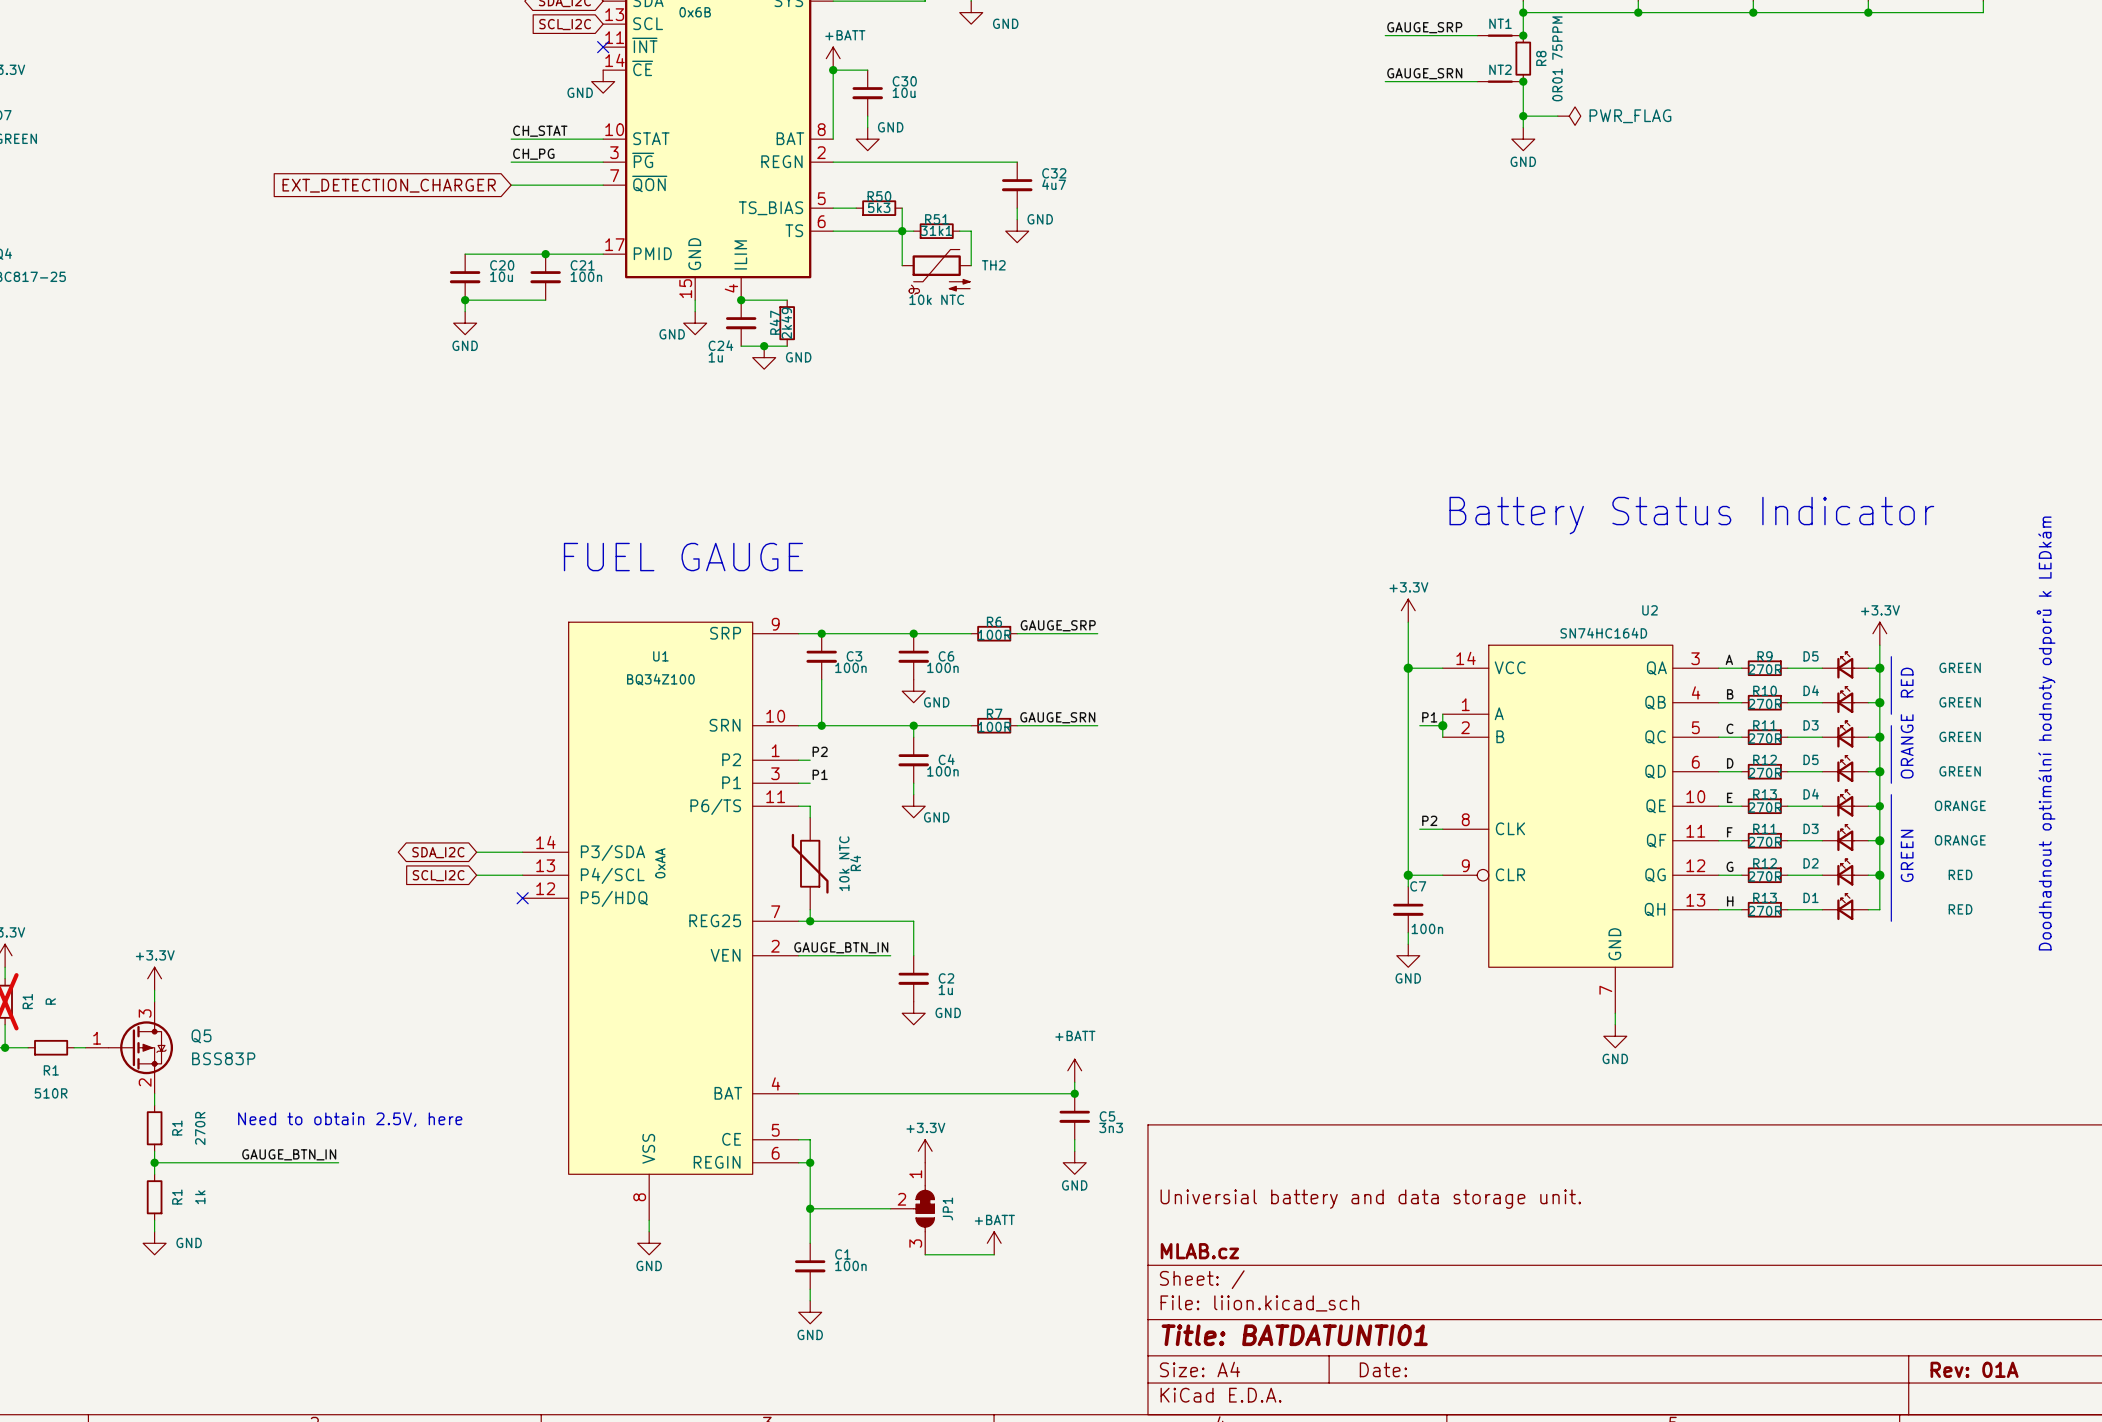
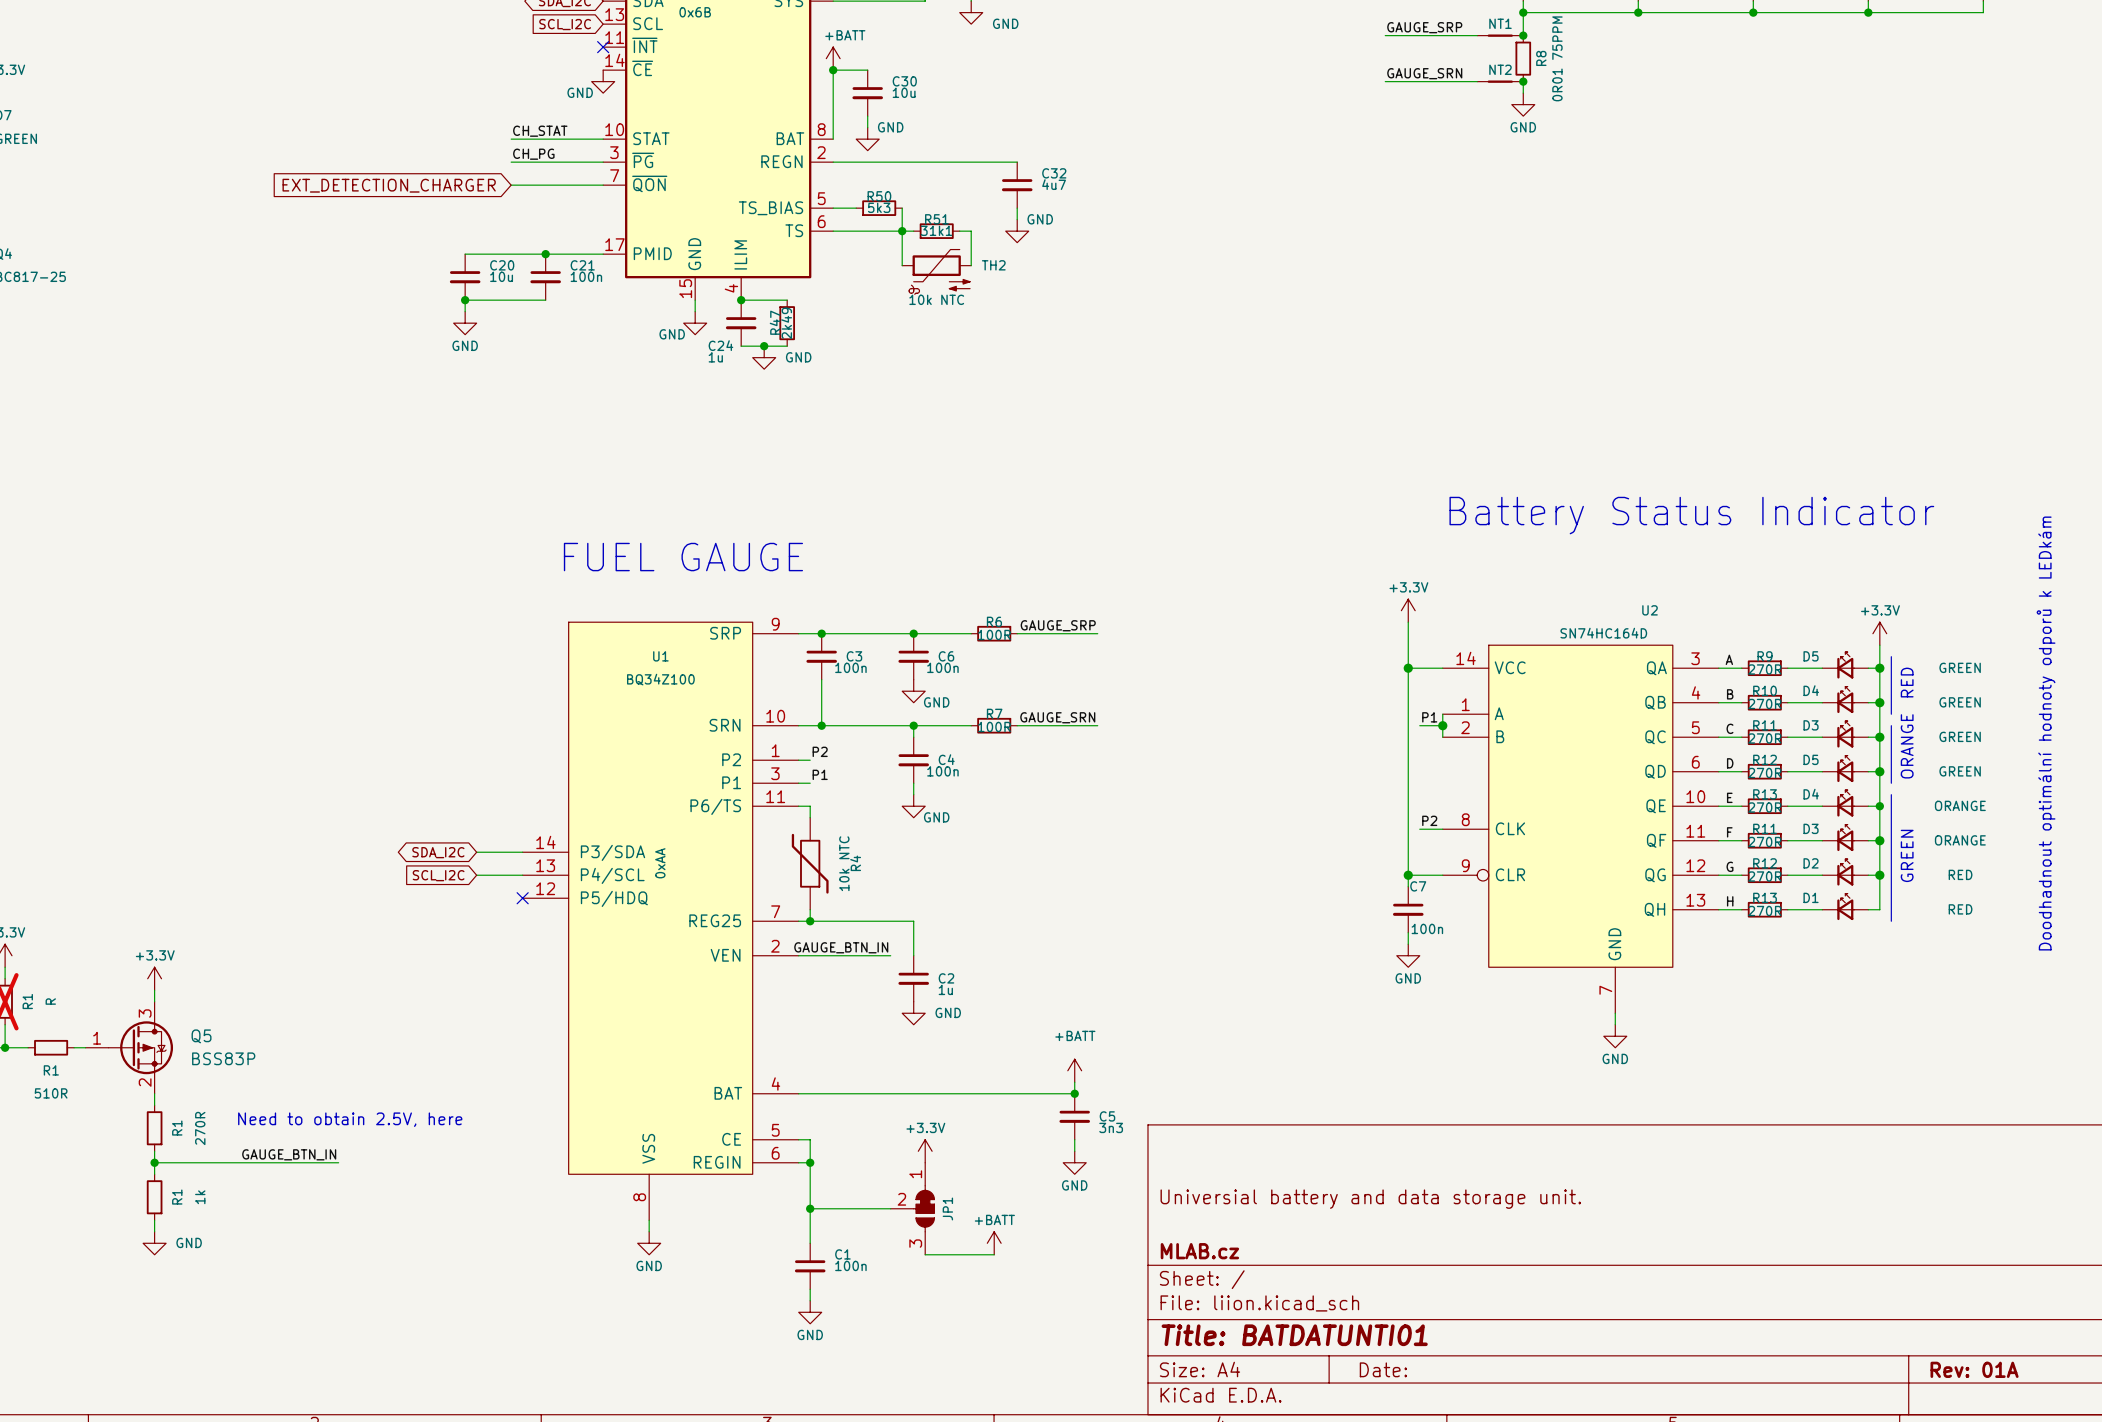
wire: (1523, 93) (1523, 127) -> none
wire: (1523, 116) (1557, 116) -> none
junction: (1523, 116) -> none
power symbol: PWR_FLAG (1569, 116) -> none
power symbol position: GND (1523, 139) -> GND (1523, 104)

